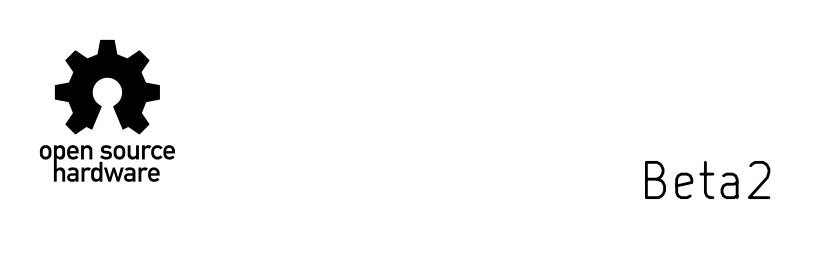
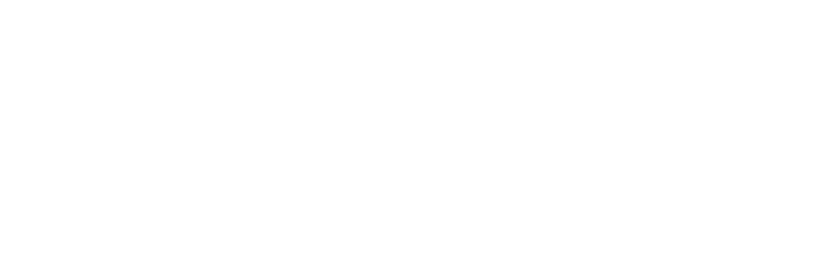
part: (107, 110) -> none
text: Beta2 (707, 180) -> none

